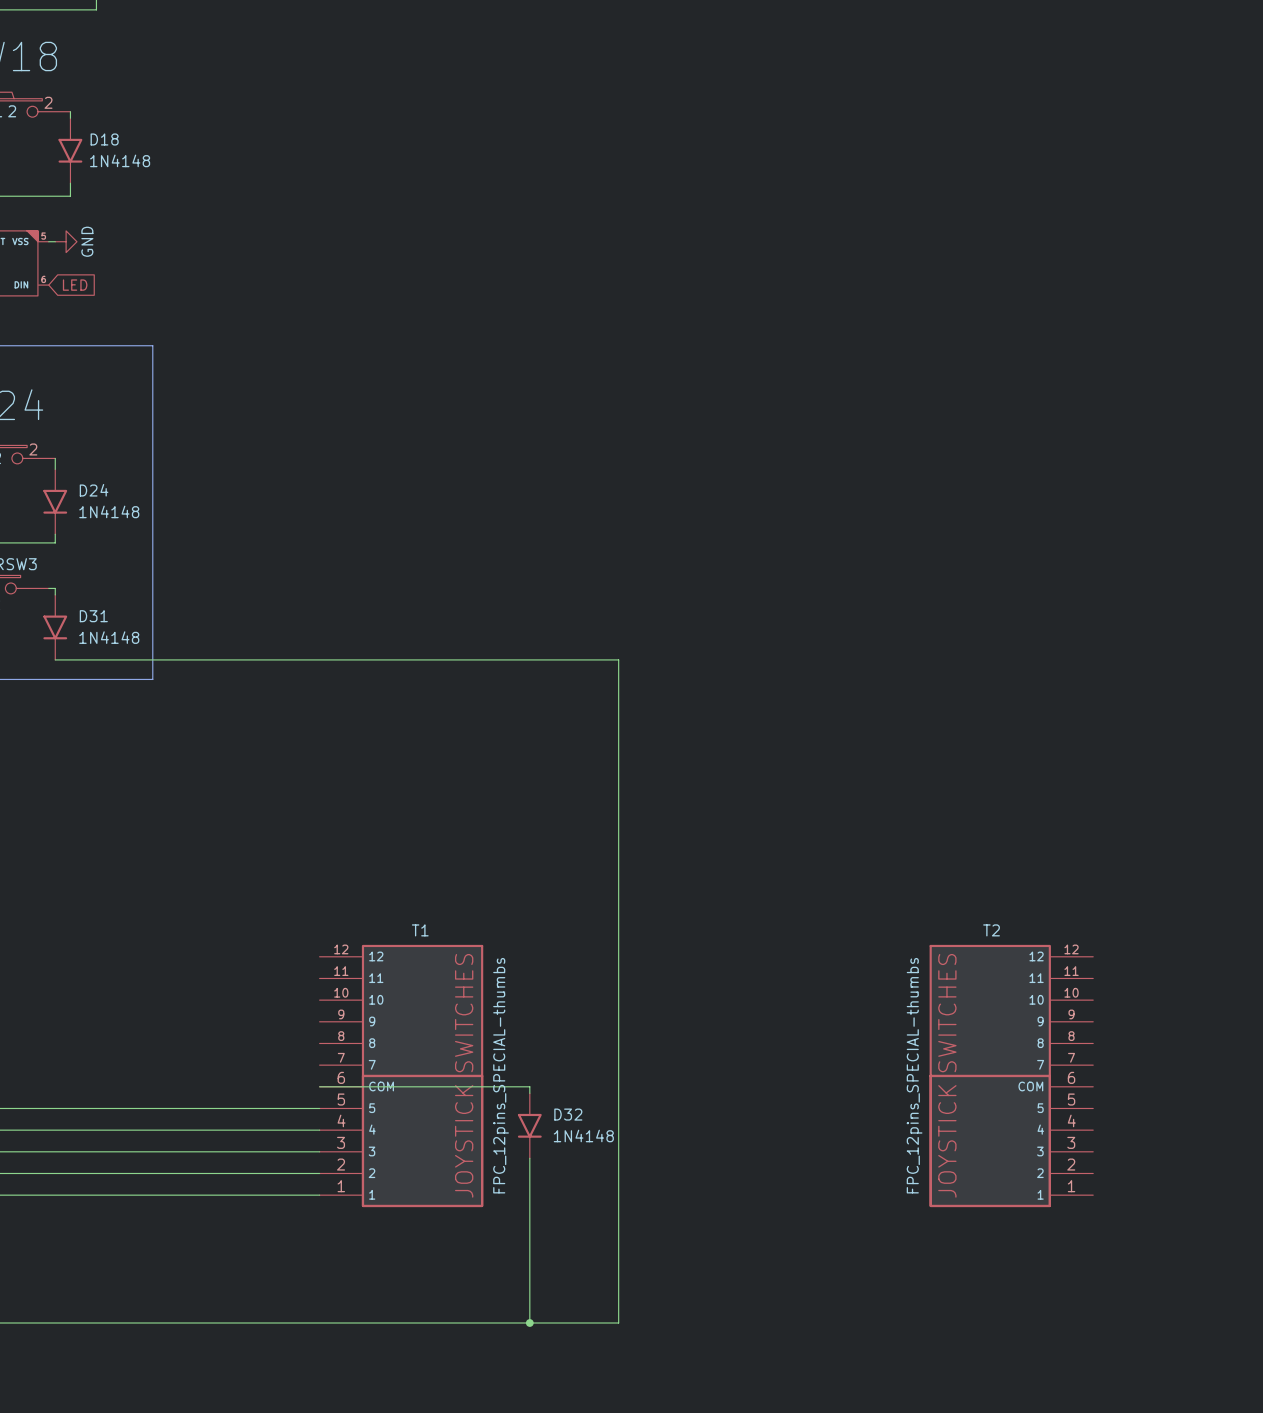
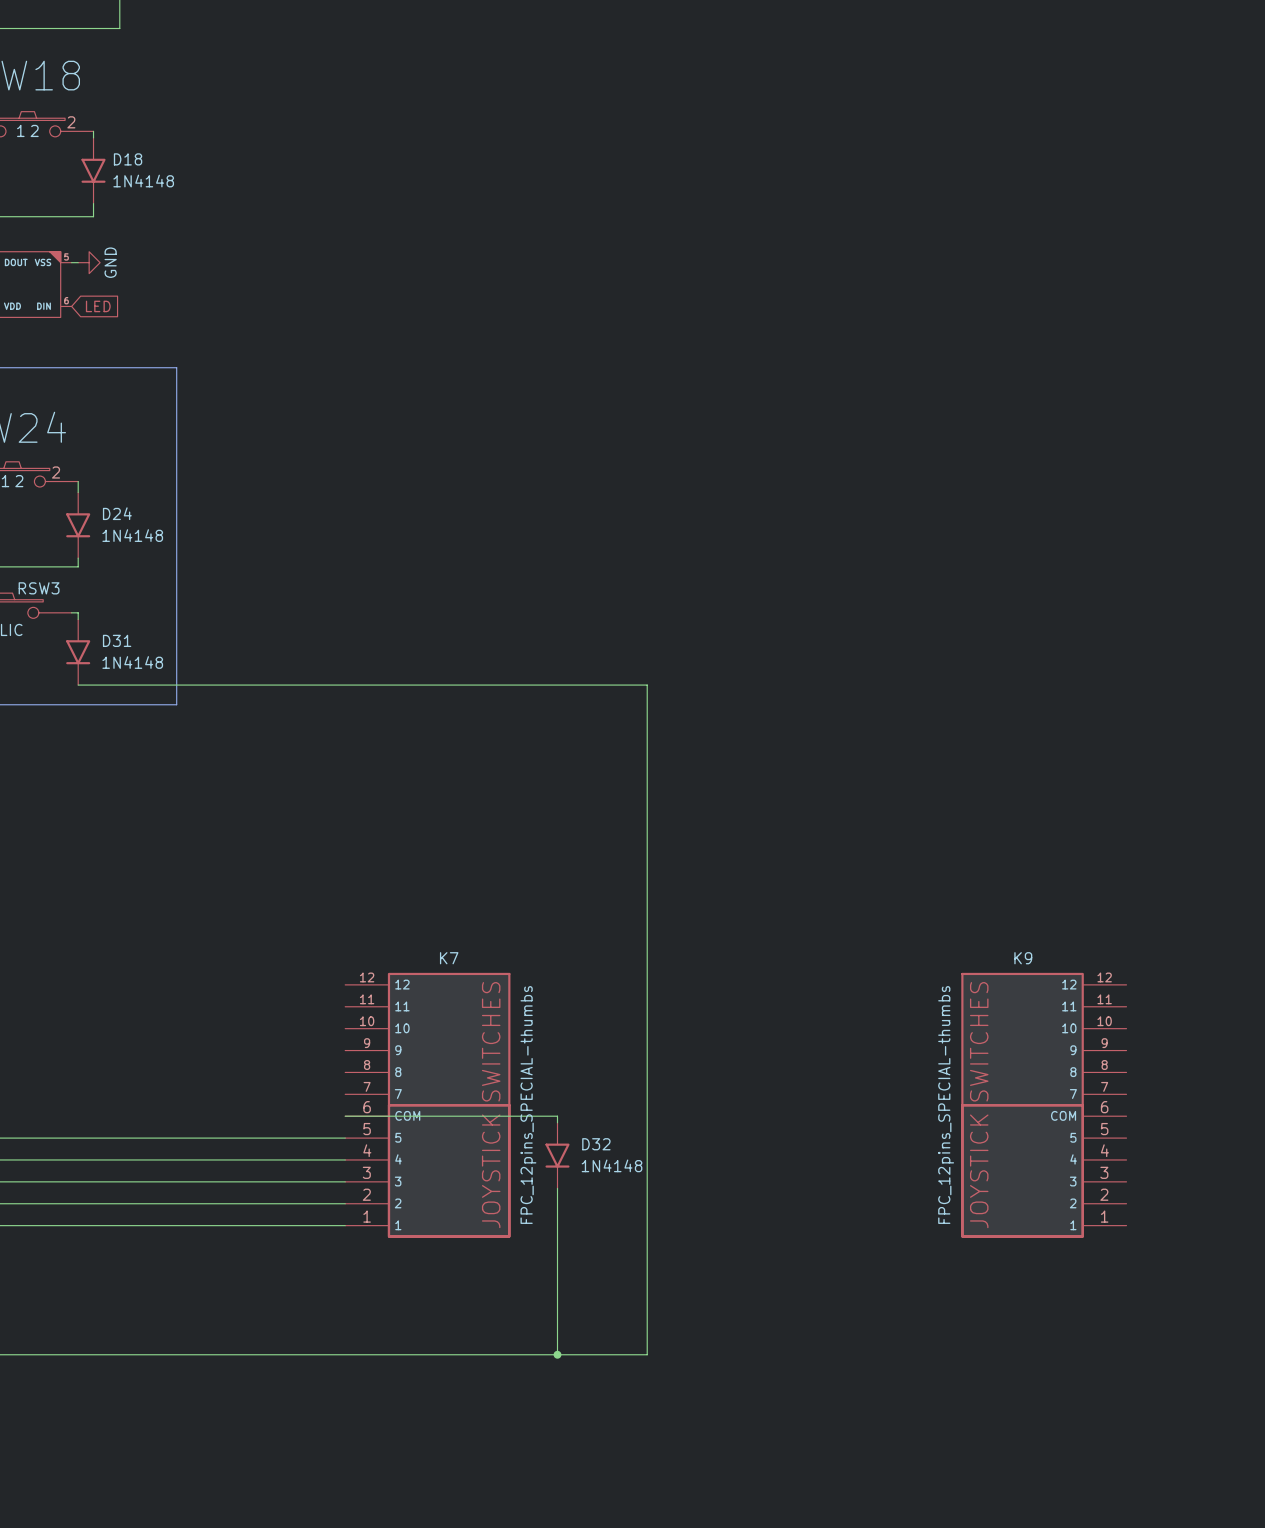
T1 name: T1 (420, 930) -> K7 (449, 958)
T2 name: T2 (991, 930) -> K9 (1023, 958)

